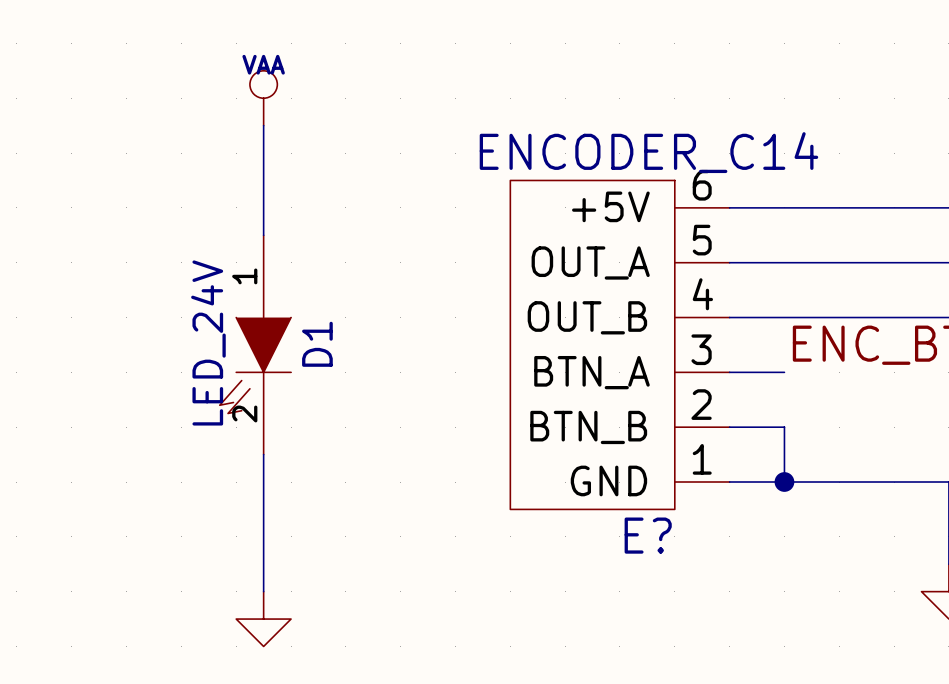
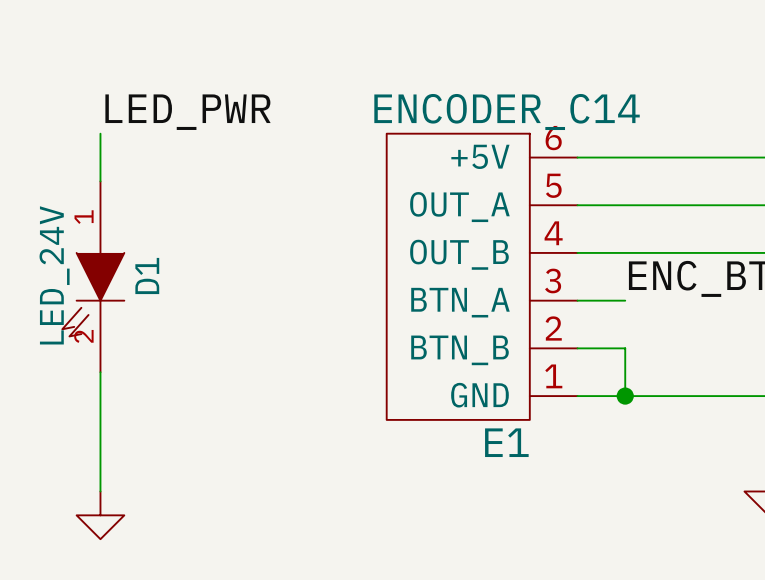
power symbol: VAA (263, 98) -> none
wire: (263, 125) (263, 235) -> none
label: none -> LED_PWR (188, 112)
wire: none -> (100, 133) (100, 181)
D1 position: (255, 344) -> (93, 276)
wire: (263, 454) (263, 591) -> (100, 372) (100, 491)
E? name: E? (648, 535) -> E1 (506, 442)
power symbol position: (263, 619) -> (100, 515)

